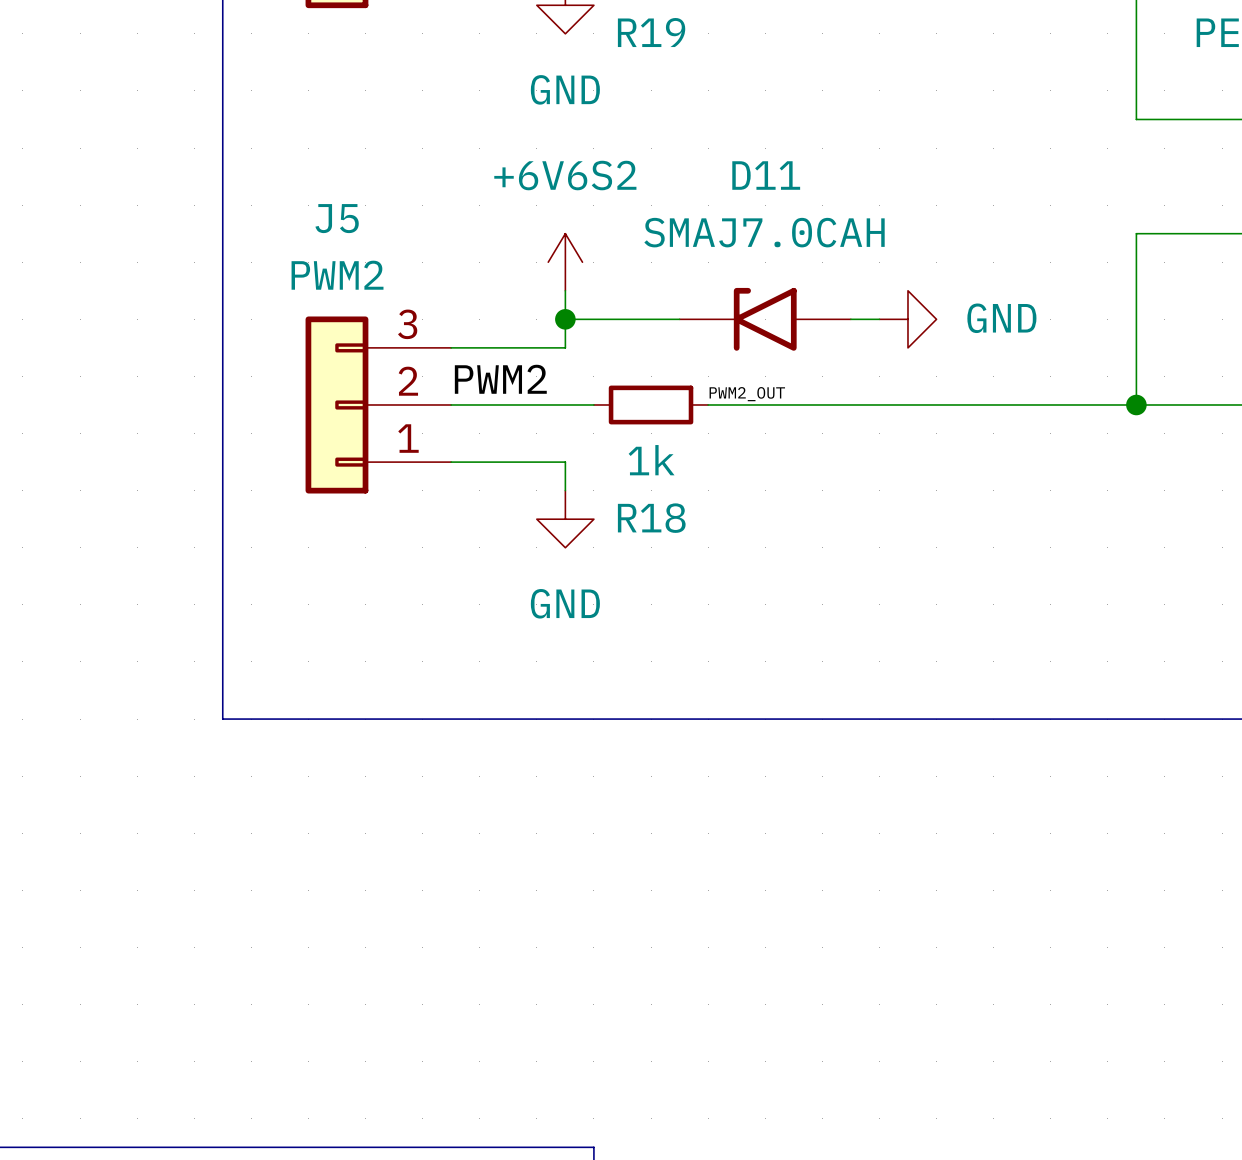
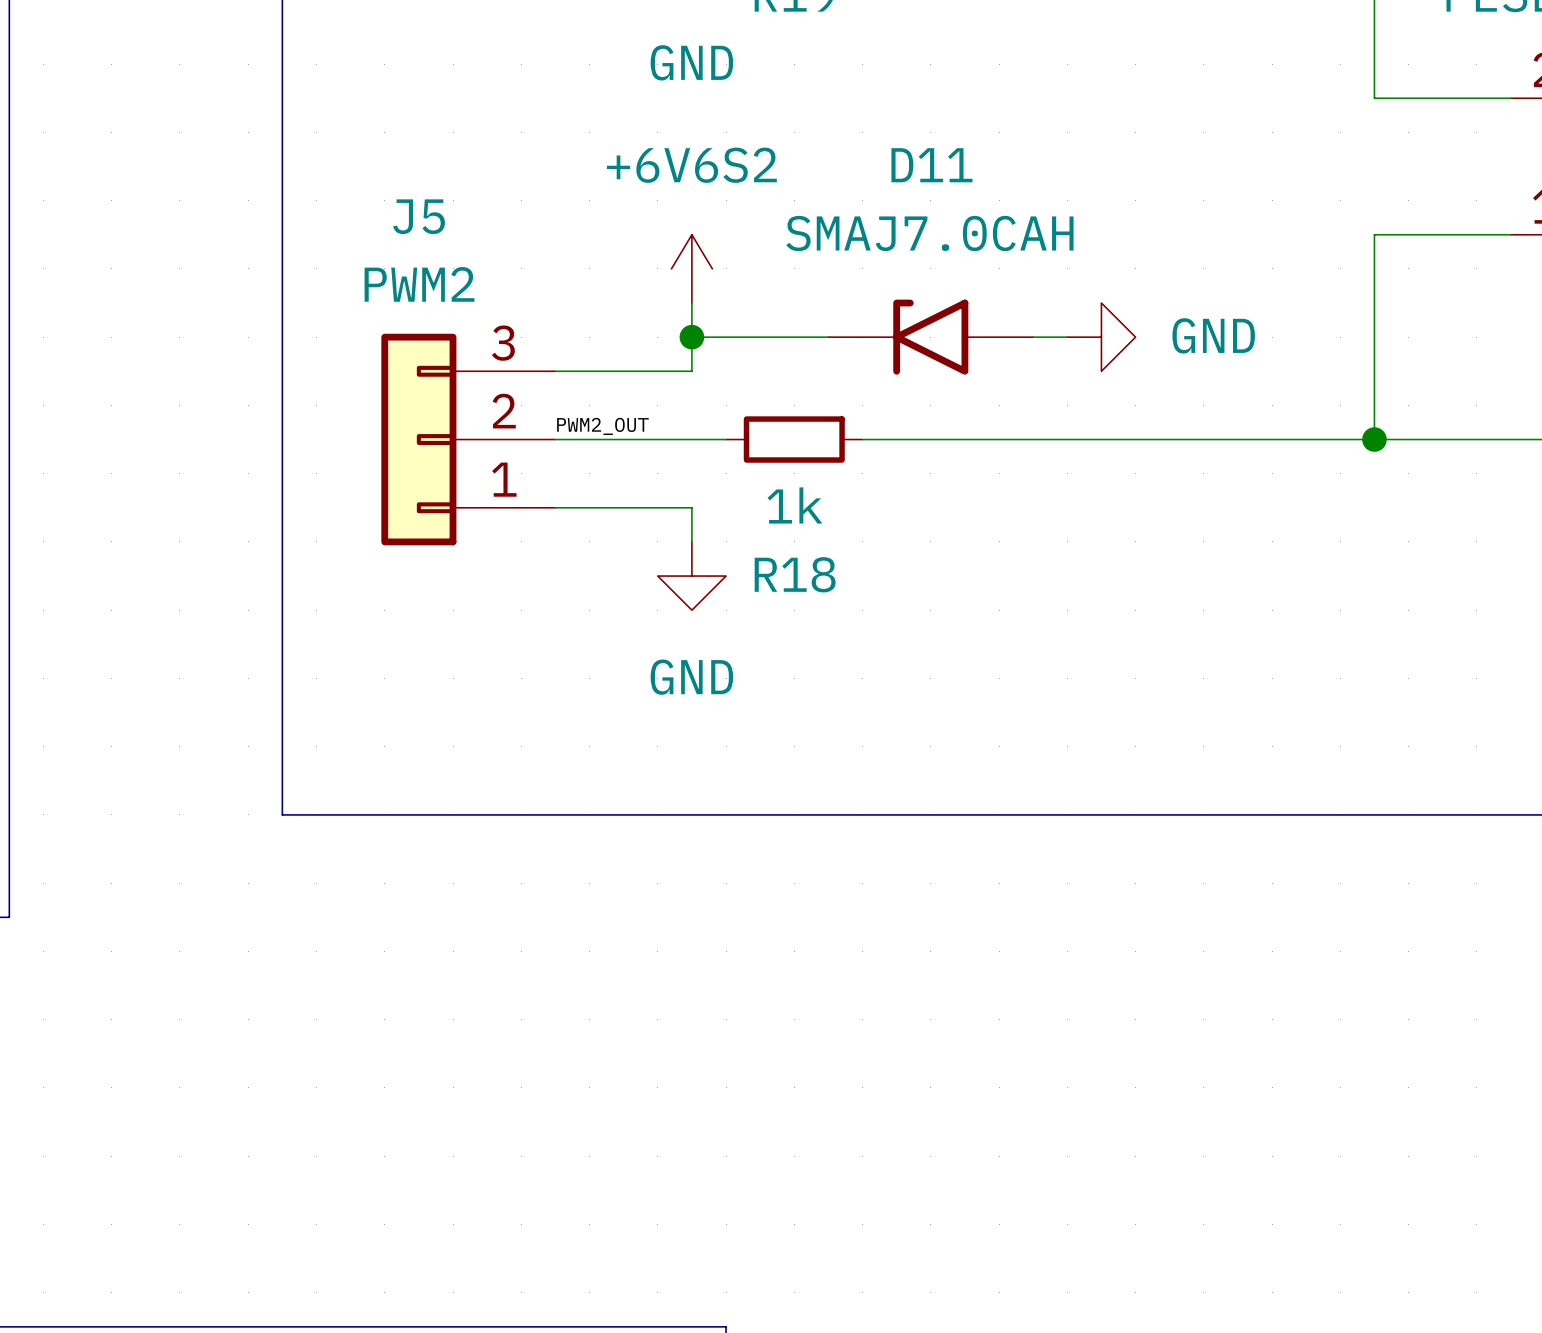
label: PWM2 (500, 379) -> PWM2_OUT (602, 426)
label: PWM2_OUT (747, 394) -> none

